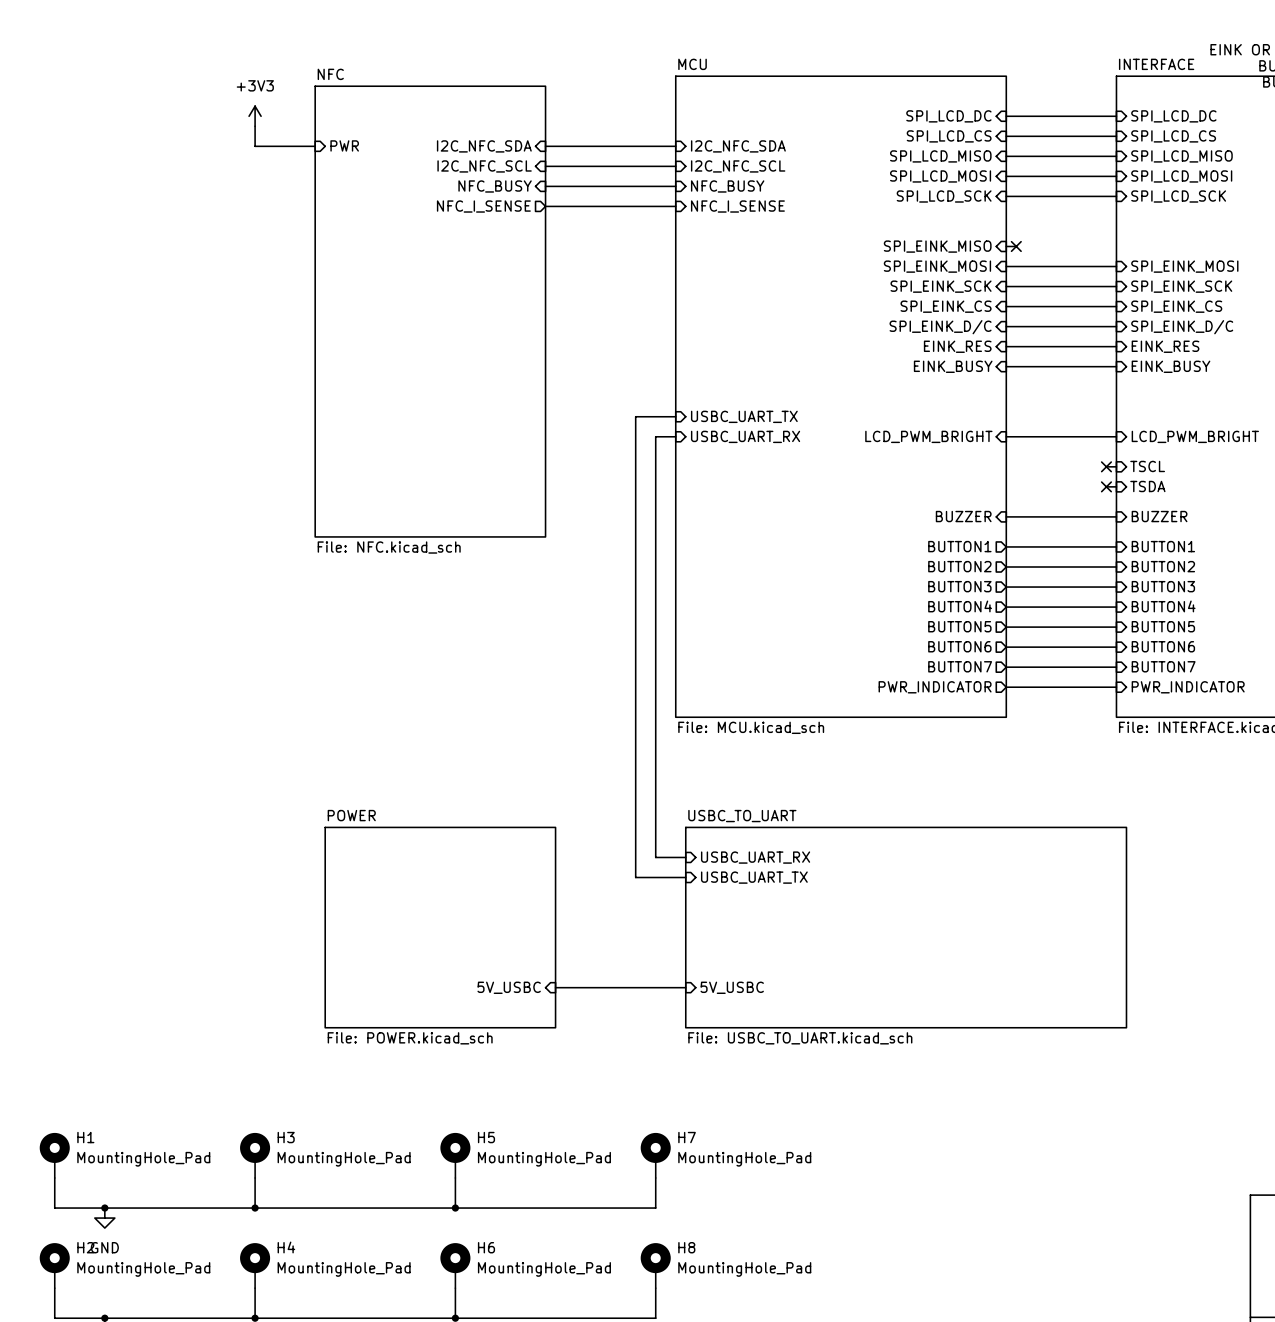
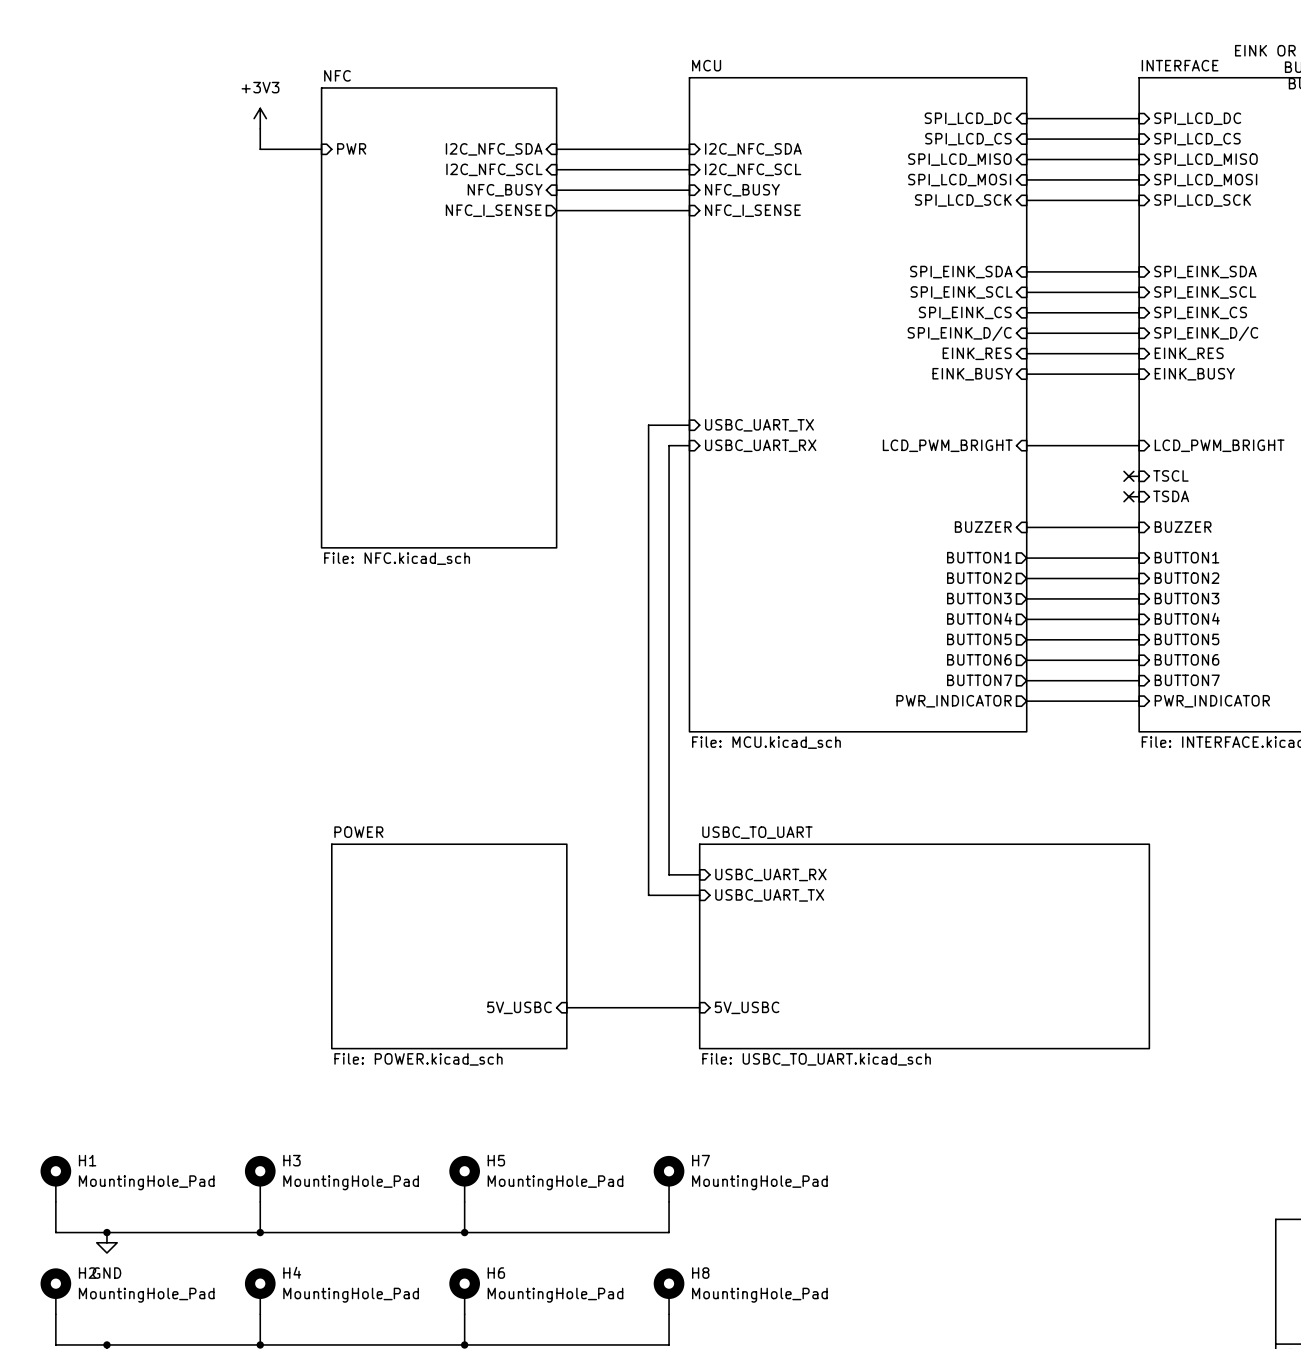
sheet pin: SPI_EINK_MISO (937, 246) -> none
wire: (1006, 246) (1016, 246) -> none
no-connect mark: (1016, 246) -> none
sheet pin: SPI_EINK_MOSI (937, 266) -> SPI_EINK_SDA (961, 272)
sheet pin: SPI_EINK_MOSI (1184, 266) -> SPI_EINK_SDA (1205, 272)
sheet pin: SPI_EINK_SCK (941, 286) -> SPI_EINK_SCL (961, 292)
sheet pin: SPI_EINK_SCK (1181, 286) -> SPI_EINK_SCL (1205, 292)

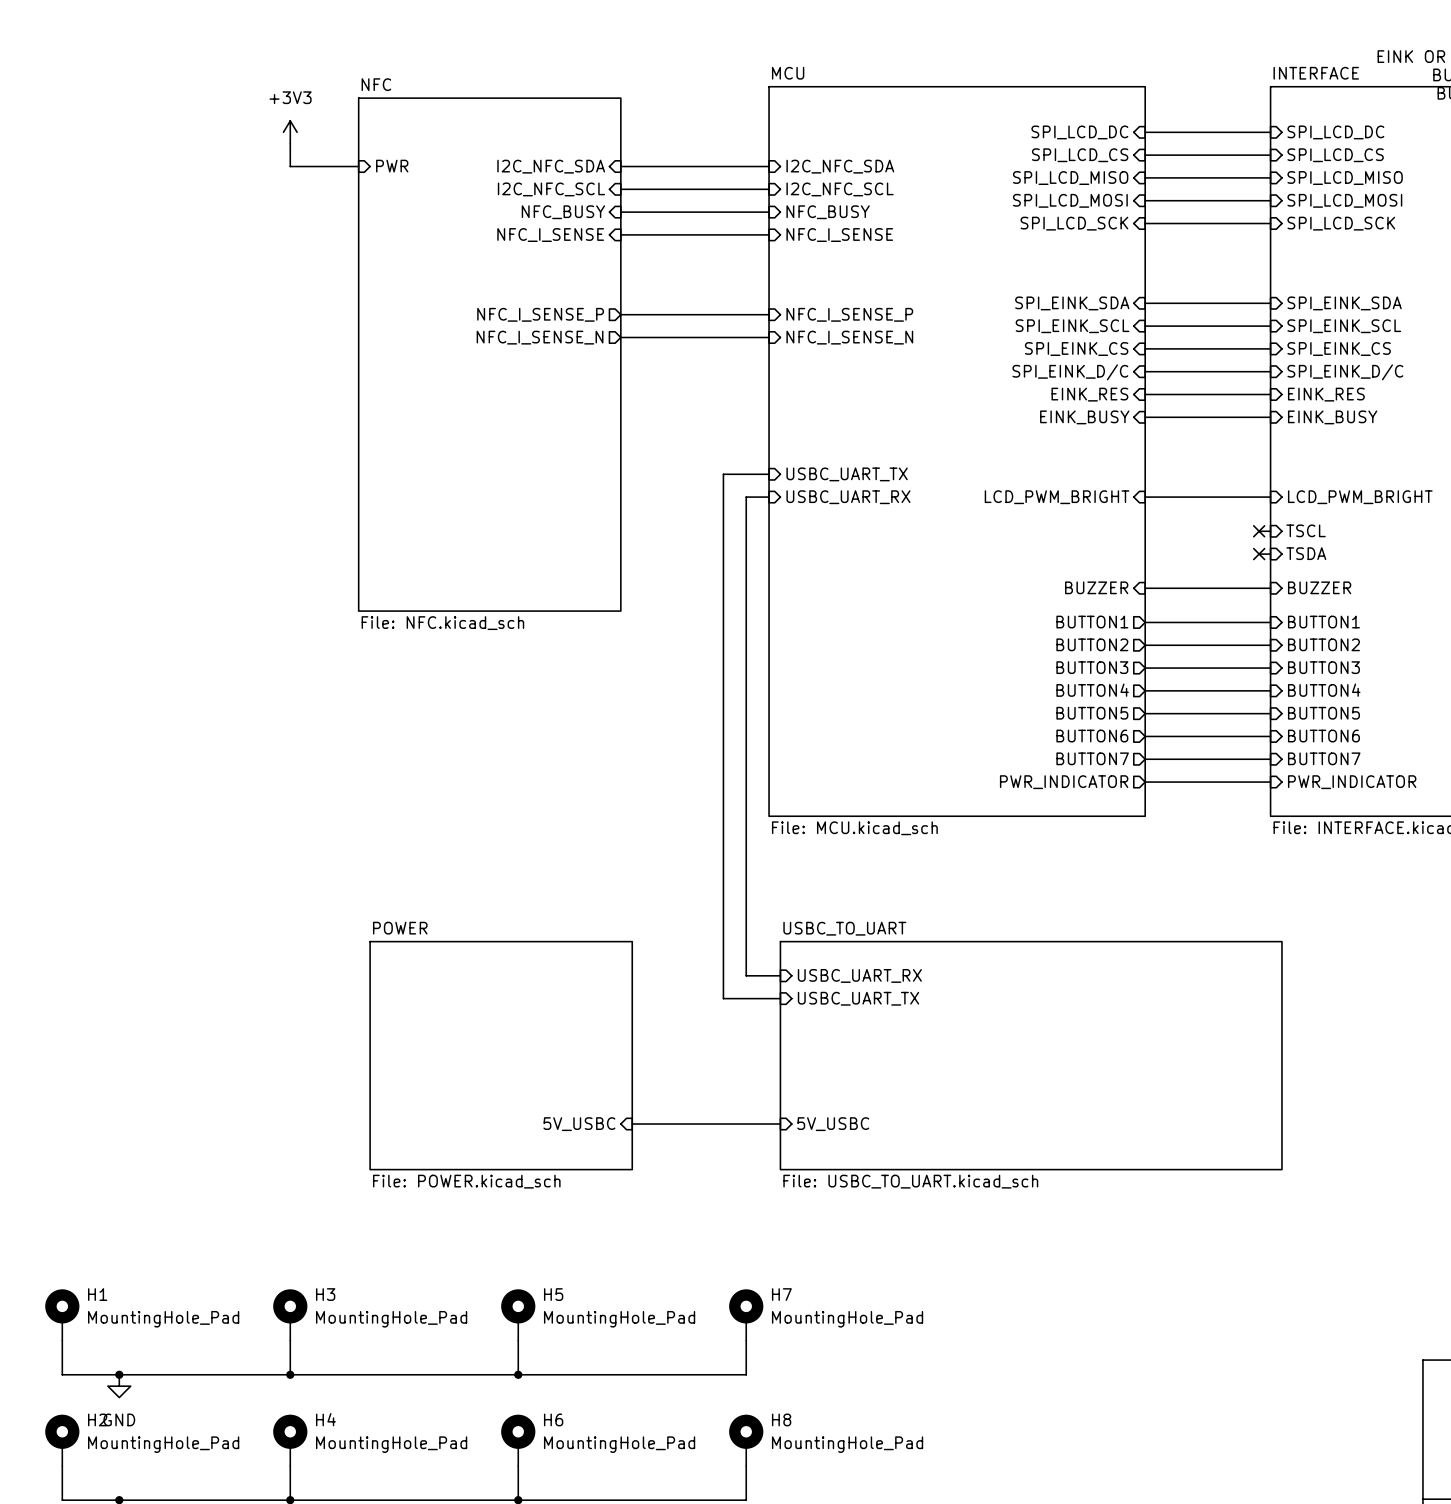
sheet pin shape: output (493, 210) -> input (550, 235)
sheet pin: none -> NFC_I_SENSE_P (540, 314)
wire: none -> (620, 314) (769, 314)
sheet pin: none -> NFC_I_SENSE_P (849, 314)
sheet pin: none -> NFC_I_SENSE_N (540, 337)
wire: none -> (620, 337) (769, 337)
sheet pin: none -> NFC_I_SENSE_N (849, 337)

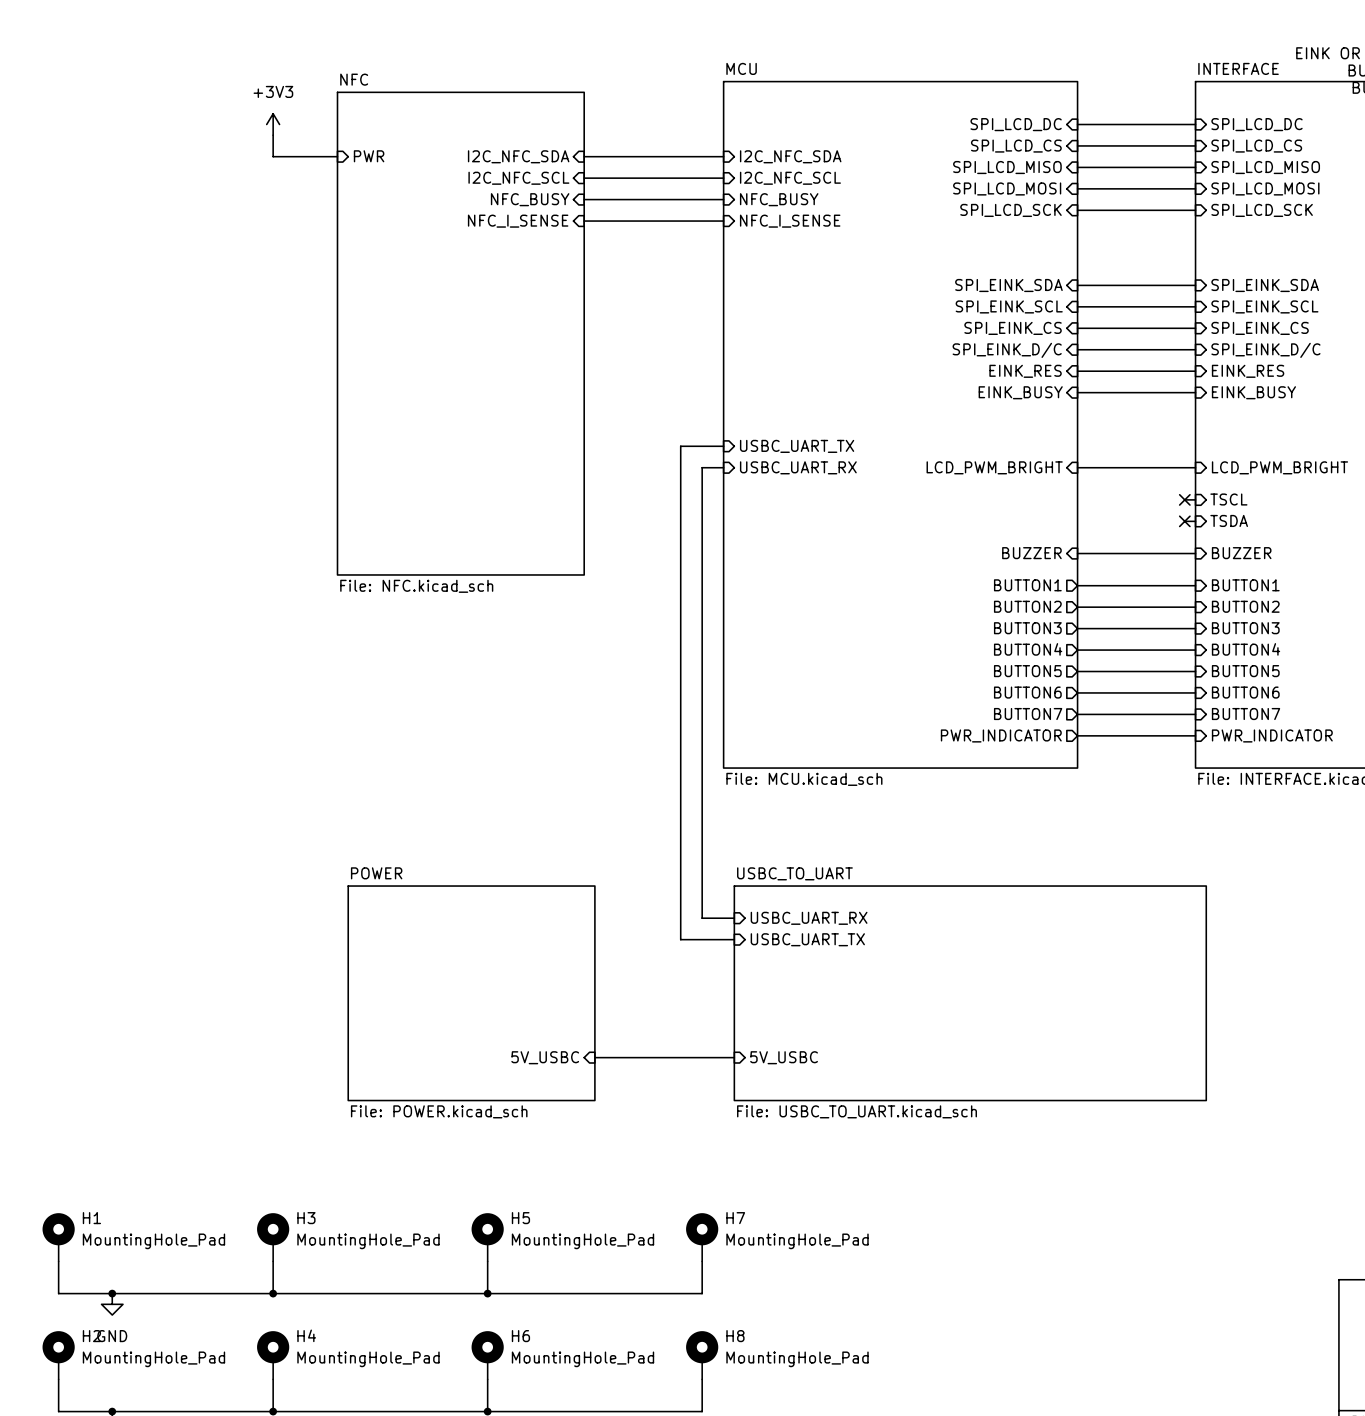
sheet pin: NFC_I_SENSE_P (540, 314) -> none
wire: (620, 314) (769, 314) -> none
sheet pin: NFC_I_SENSE_P (849, 314) -> none
sheet pin: NFC_I_SENSE_N (540, 337) -> none
wire: (620, 337) (769, 337) -> none
sheet pin: NFC_I_SENSE_N (849, 337) -> none

